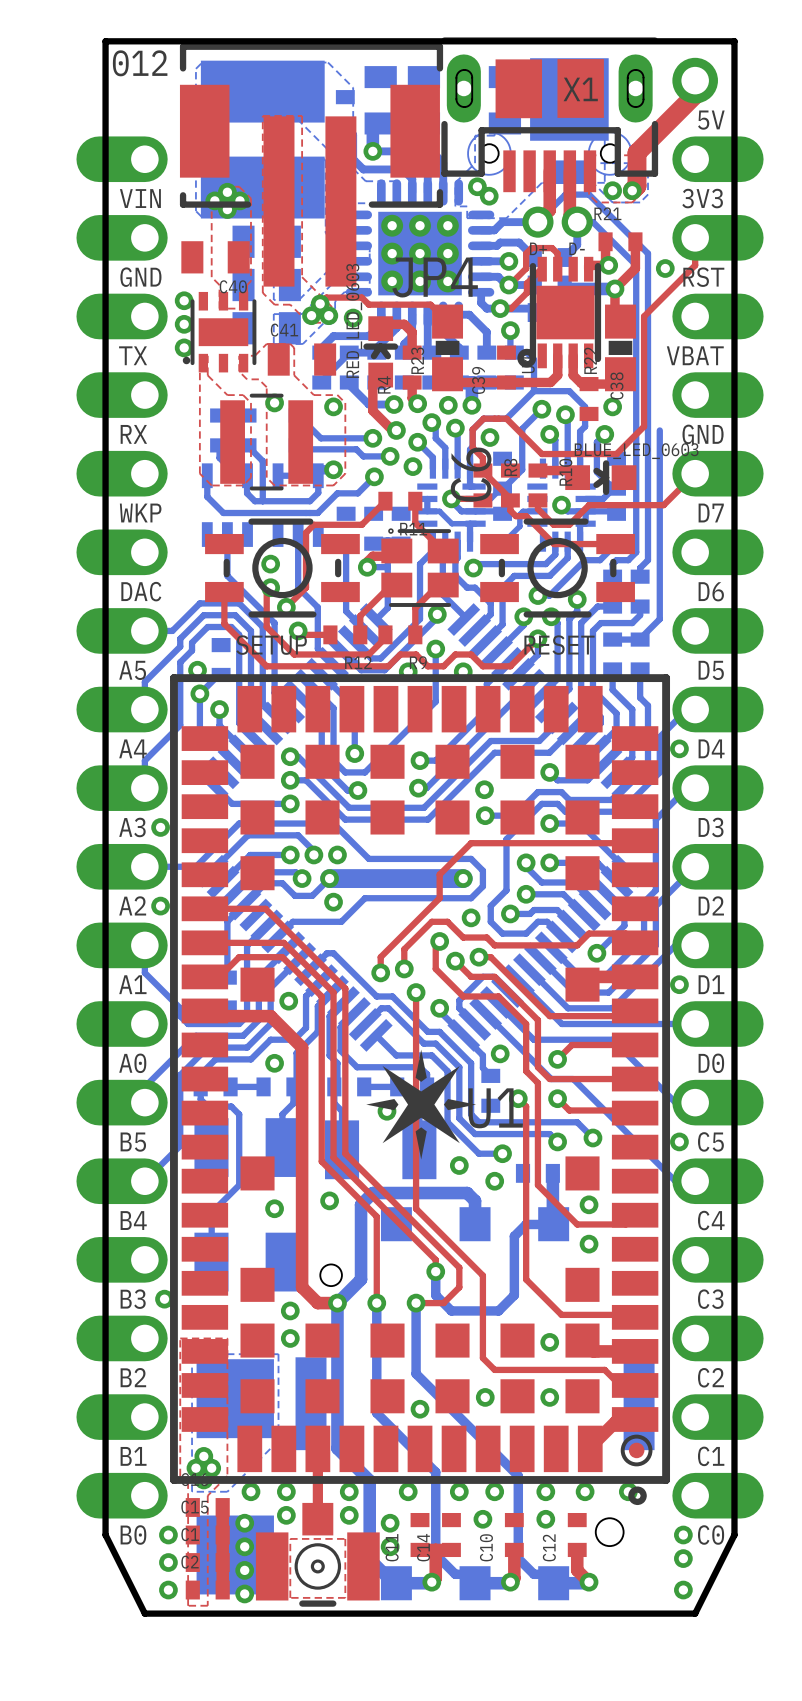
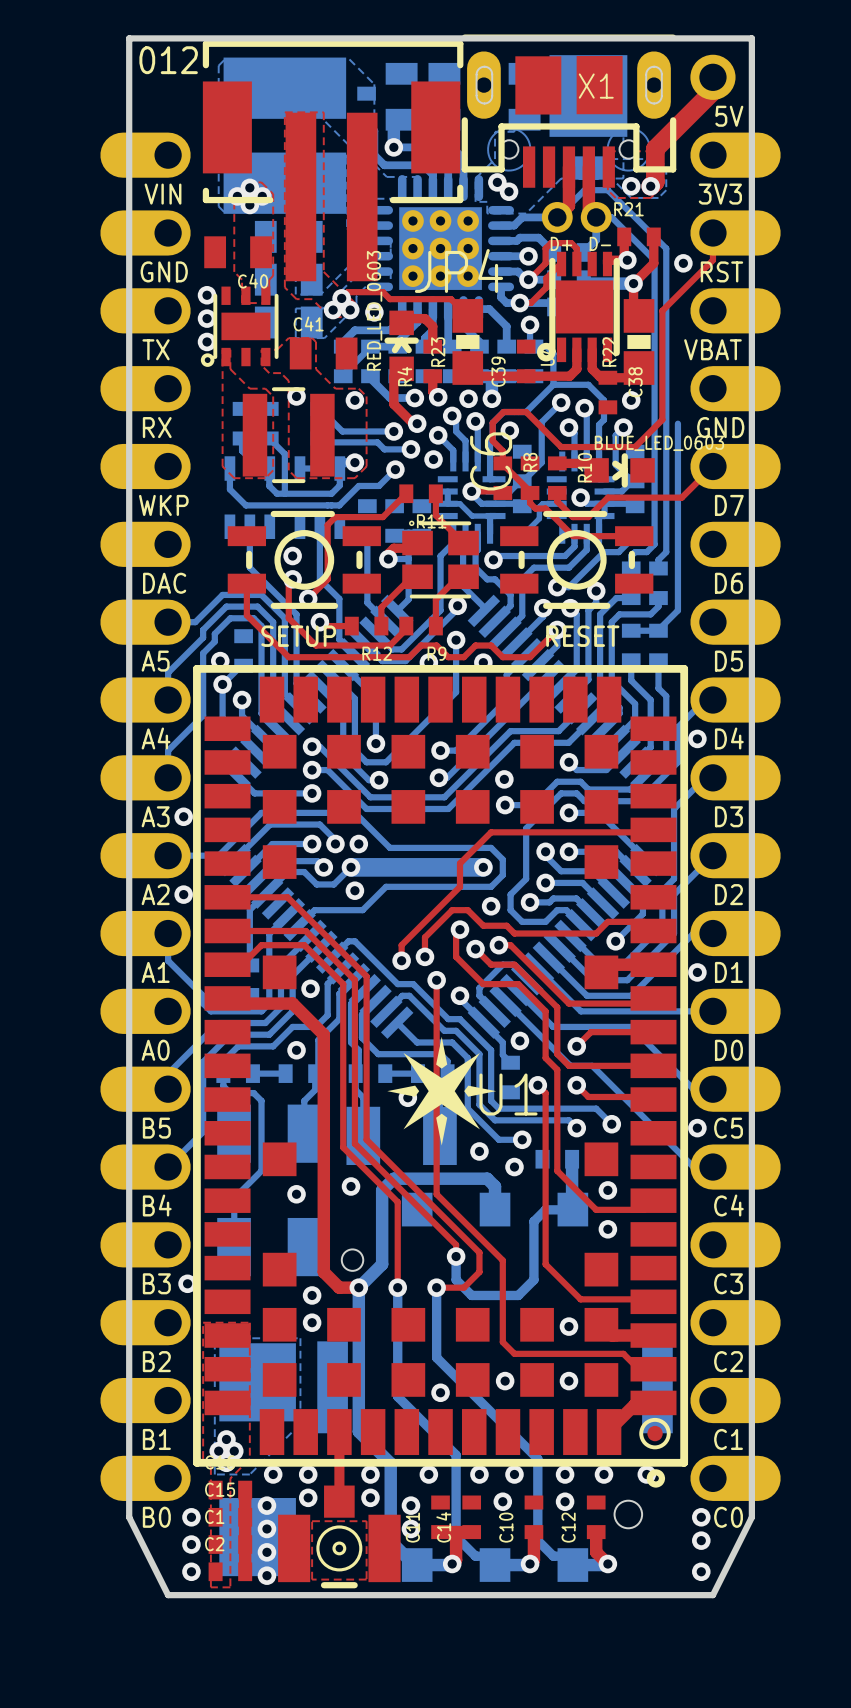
part footprint: [182, 291, 257, 373] -> [200, 286, 279, 367]

